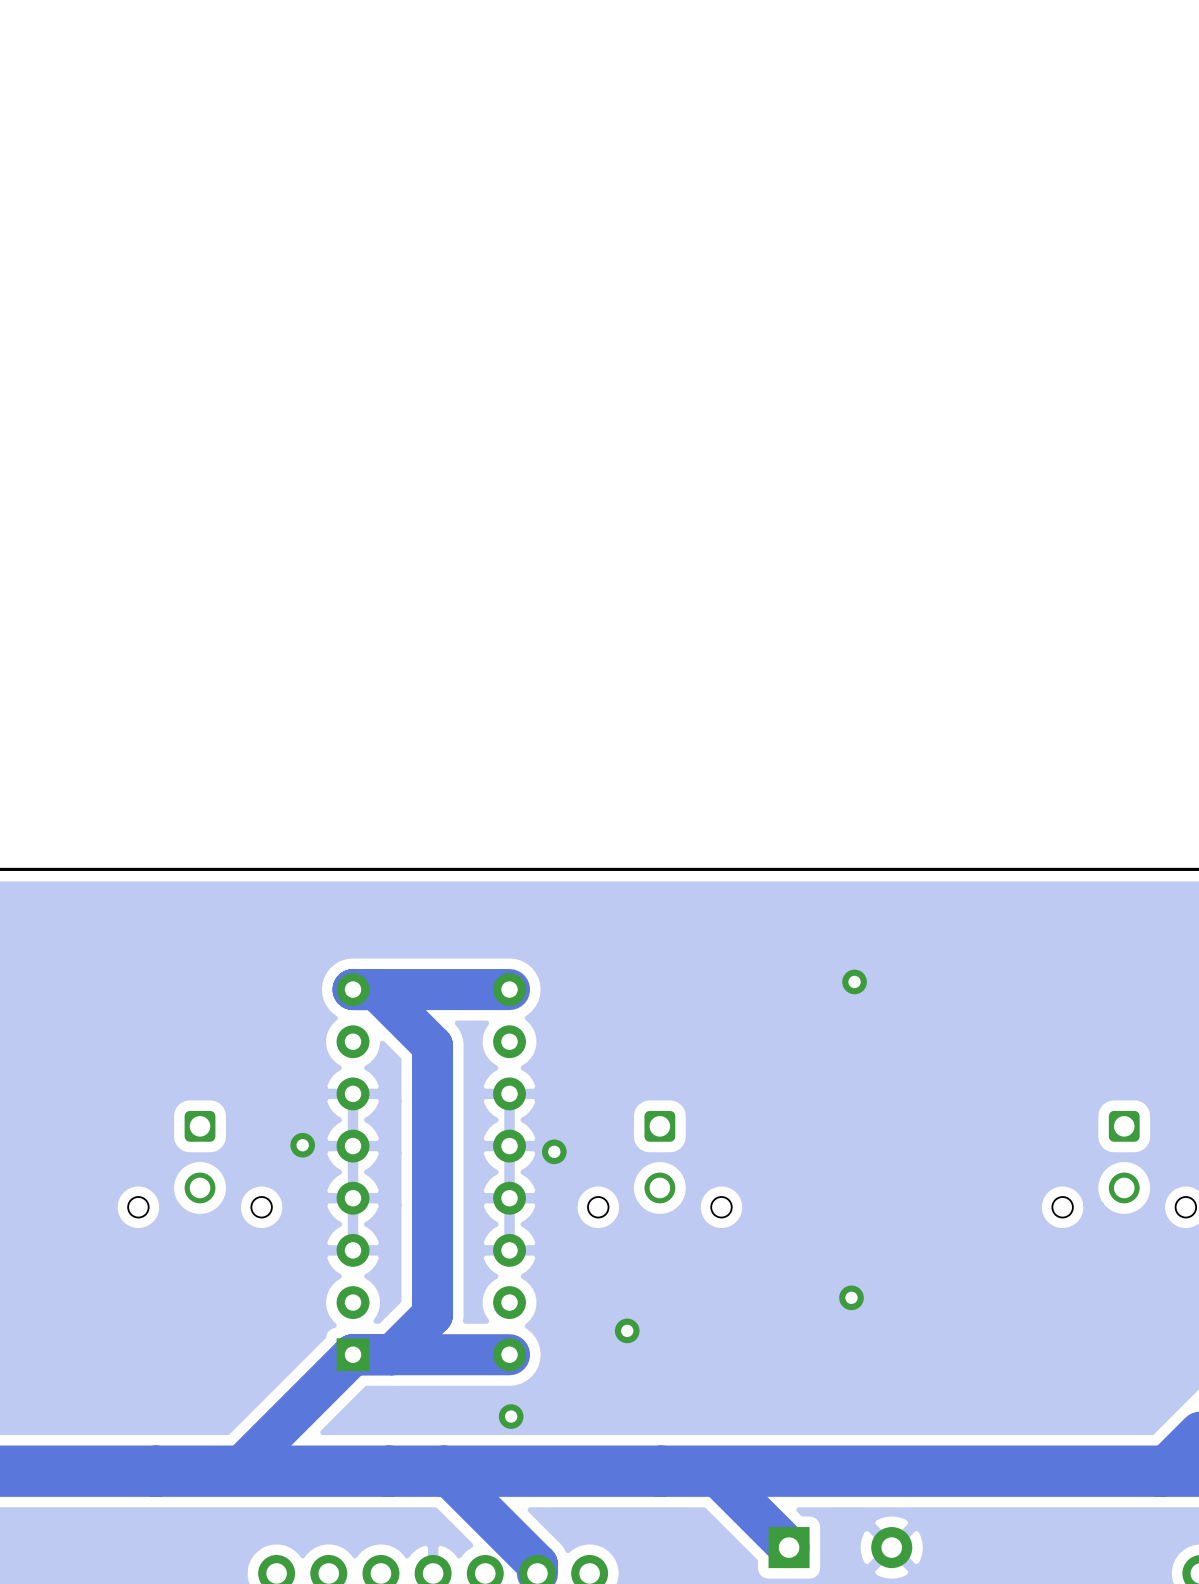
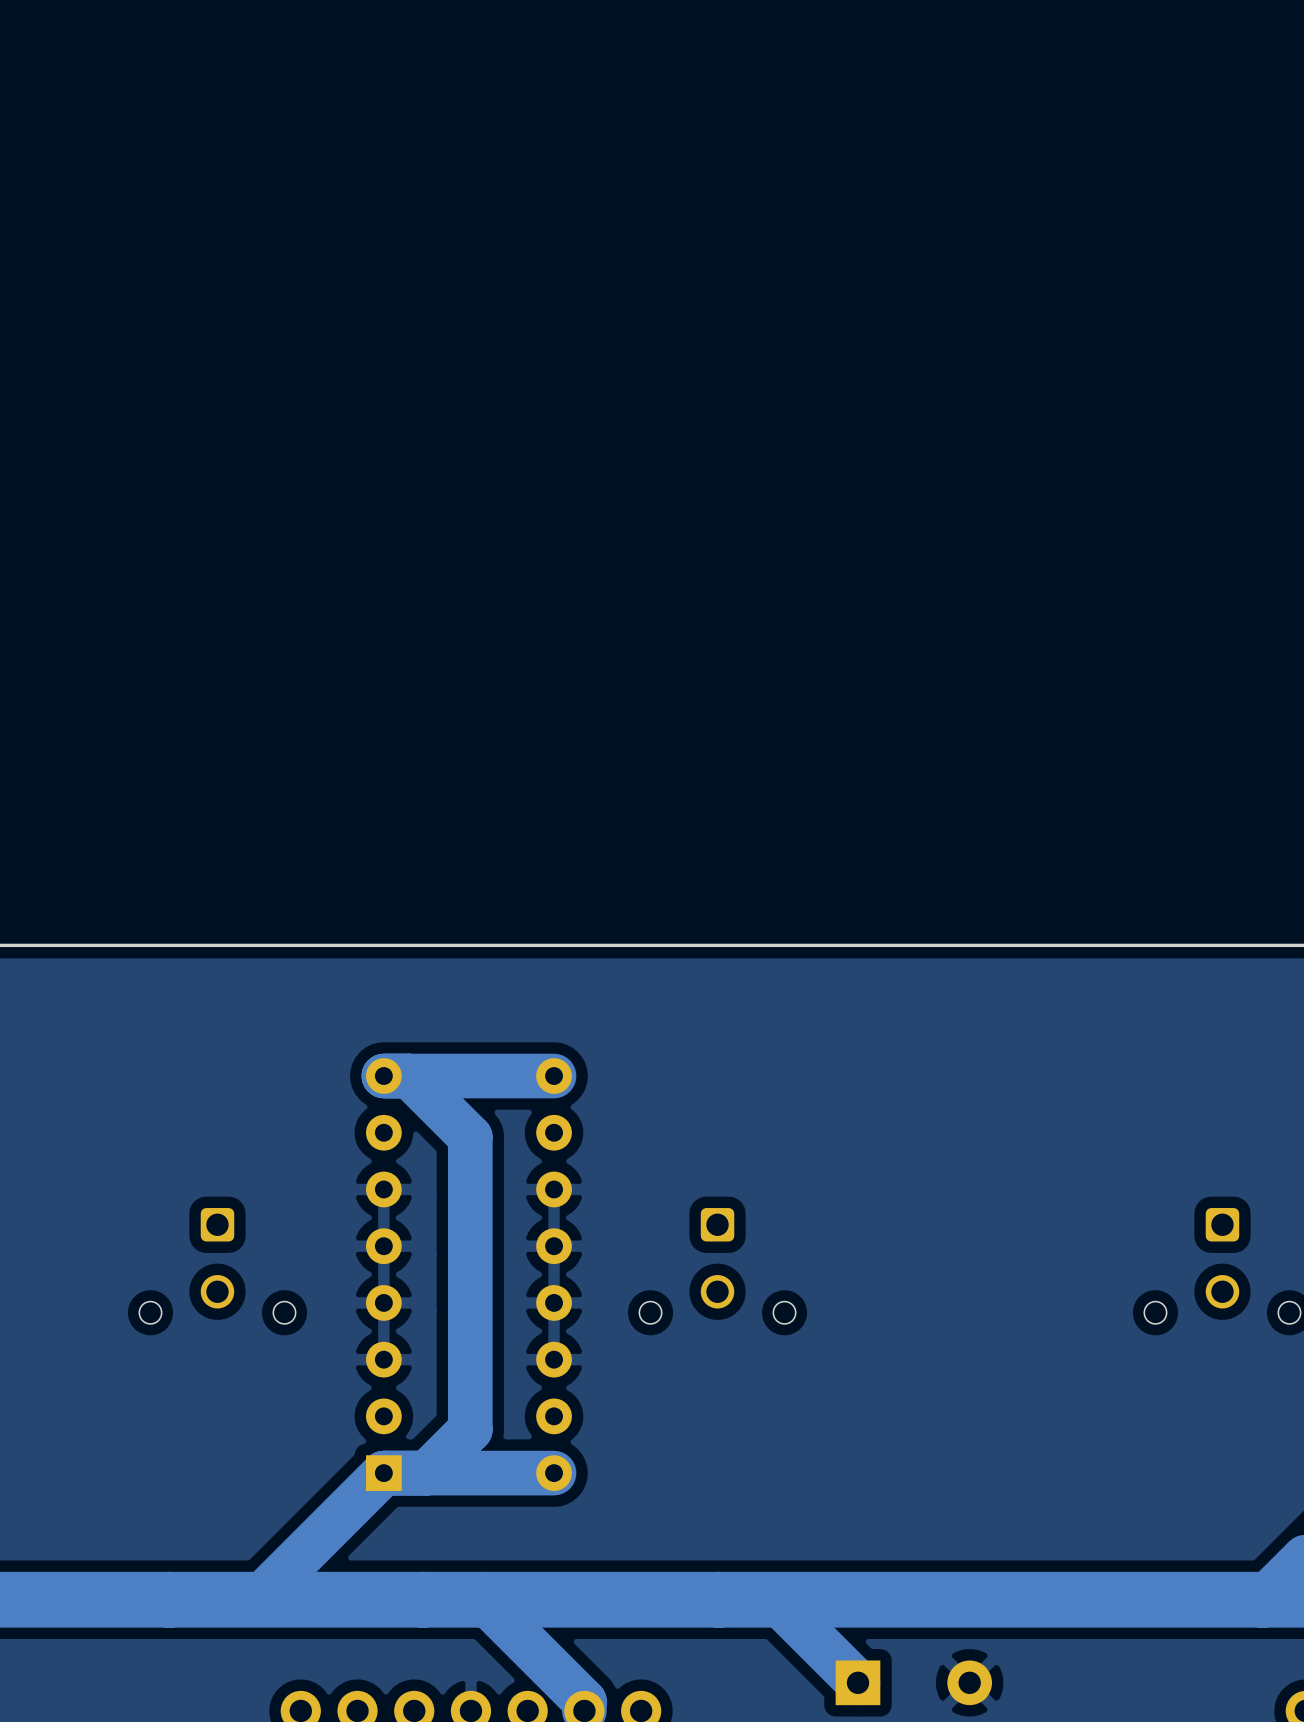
via: (854, 981) -> none
via: (302, 1145) -> none
via: (554, 1151) -> none
via: (851, 1297) -> none
via: (627, 1330) -> none
via: (511, 1416) -> none

